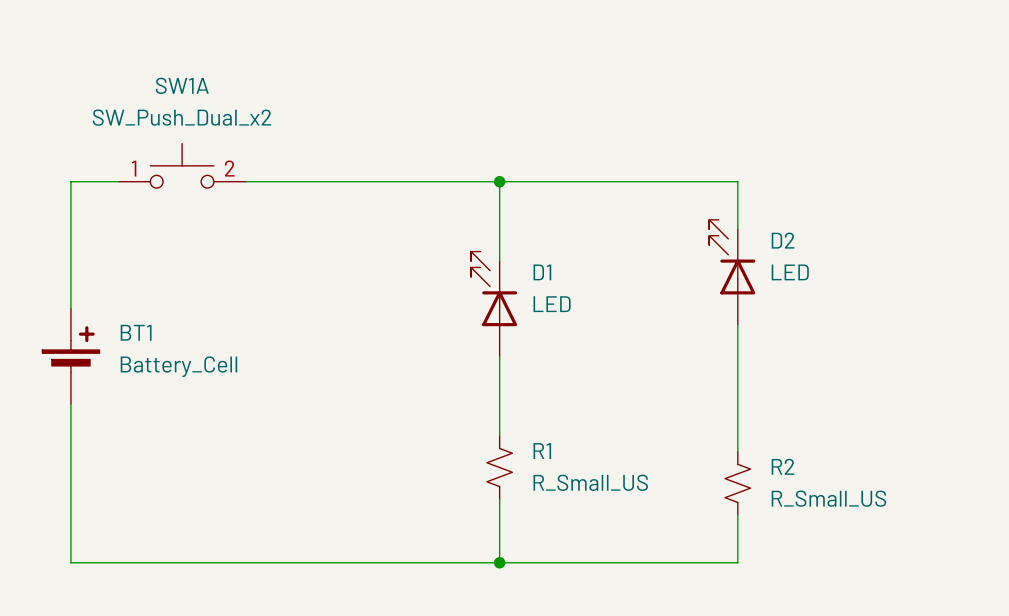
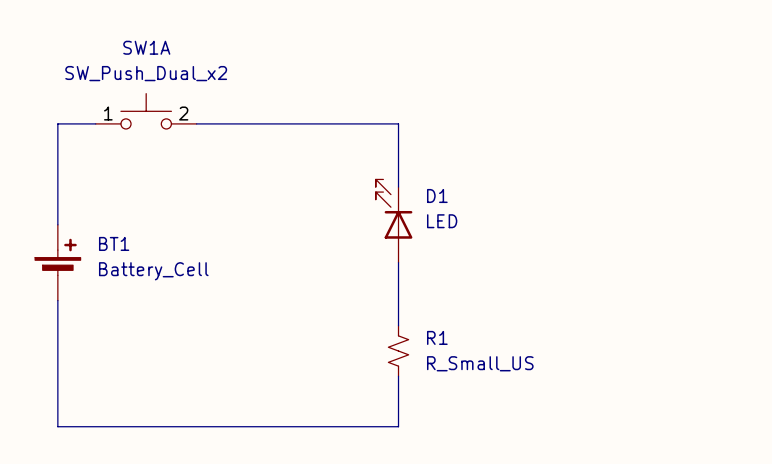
wire: (499, 181) (737, 181) (737, 229) -> none
junction: (499, 181) -> none
D2: LED (732, 272) -> none
wire: (737, 324) (737, 451) -> none
R2: R_Small_US (737, 483) -> none
wire: (737, 515) (737, 562) (499, 562) -> none
junction: (499, 562) -> none

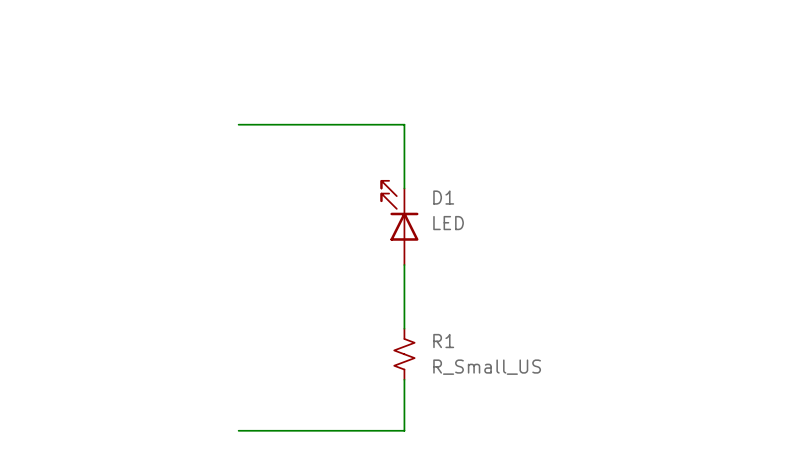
SW1A: SW_Push_Dual_x2 (146, 111) -> none
wire: (95, 123) (57, 123) (57, 224) -> none
wire: (196, 123) (234, 123) -> none
BT1: Battery_Cell (57, 262) -> none
wire: (57, 300) (57, 426) (234, 426) -> none

